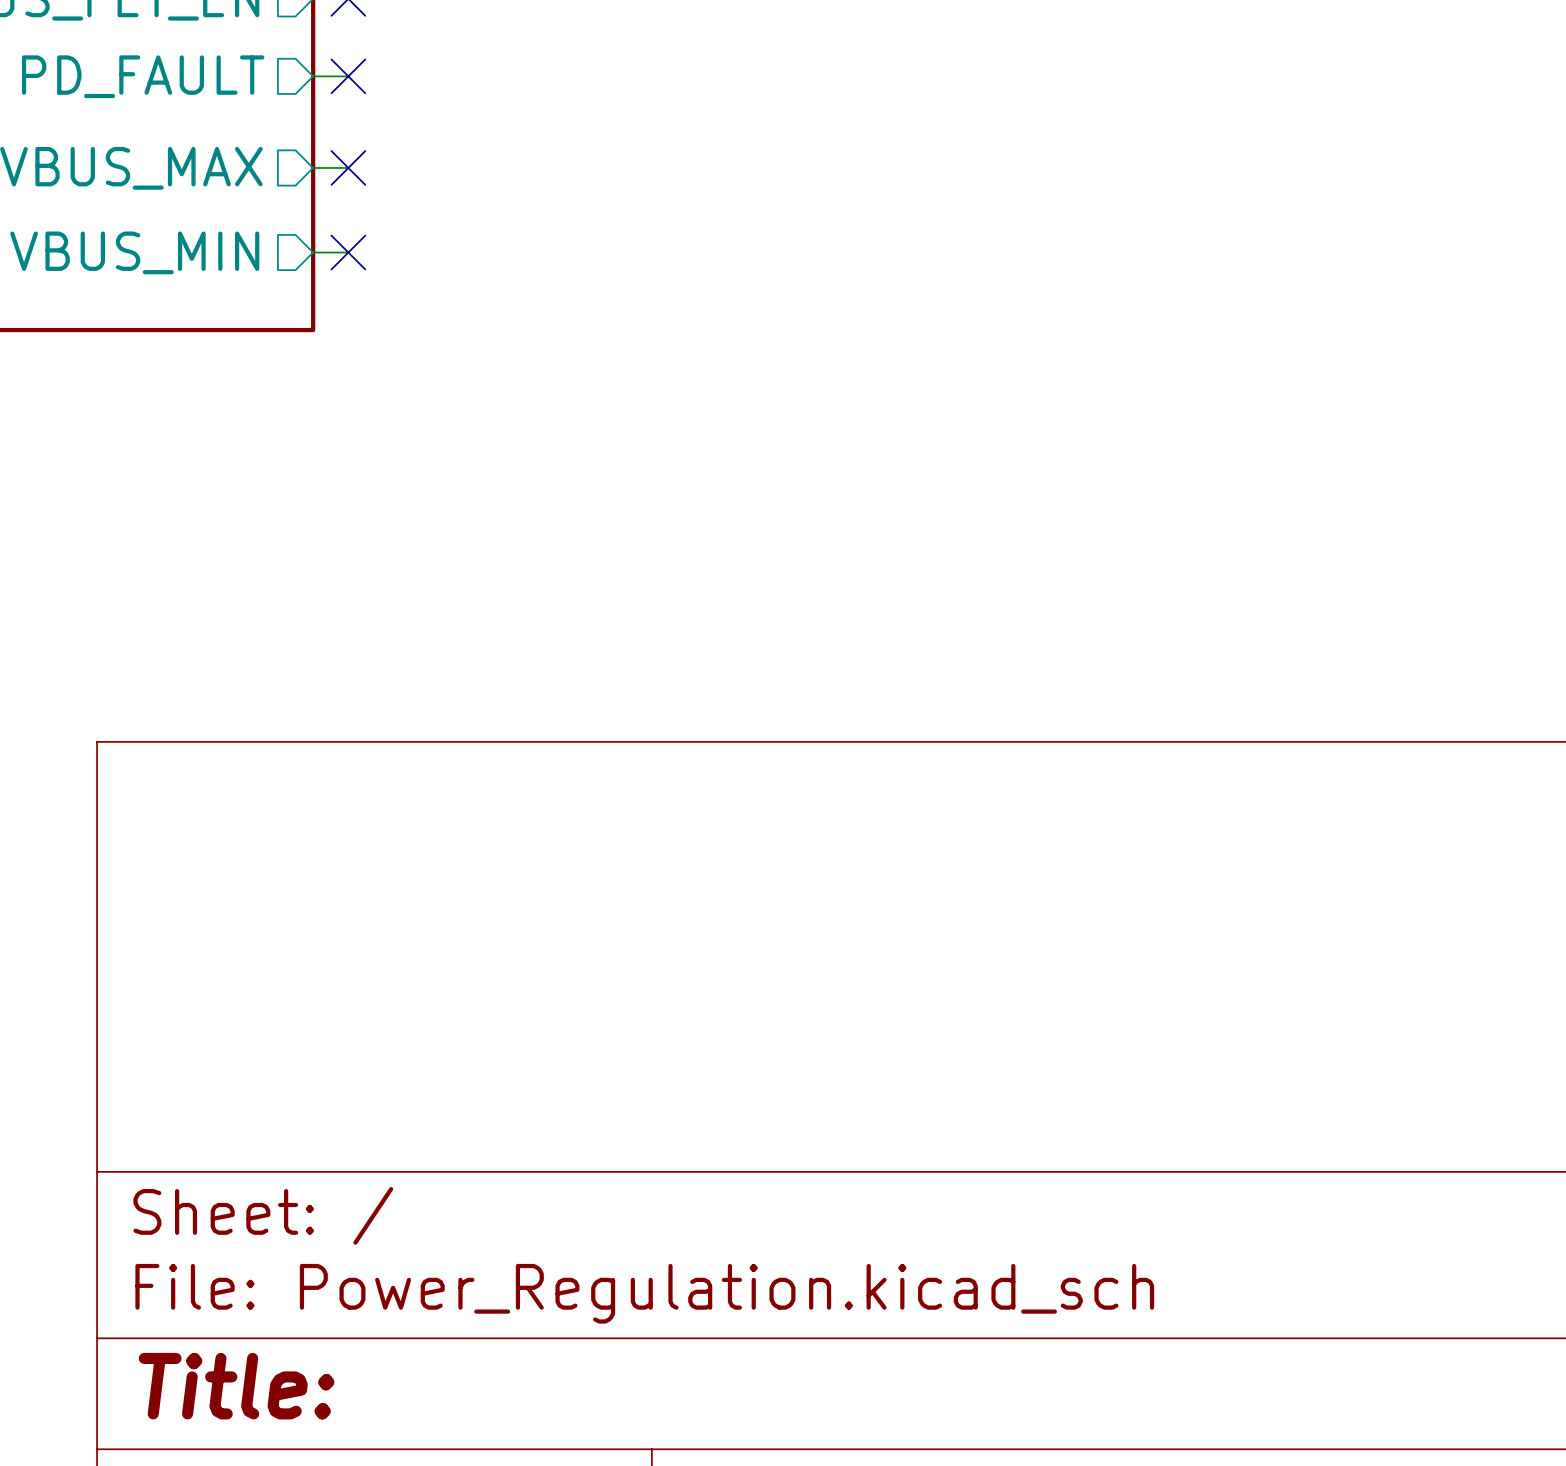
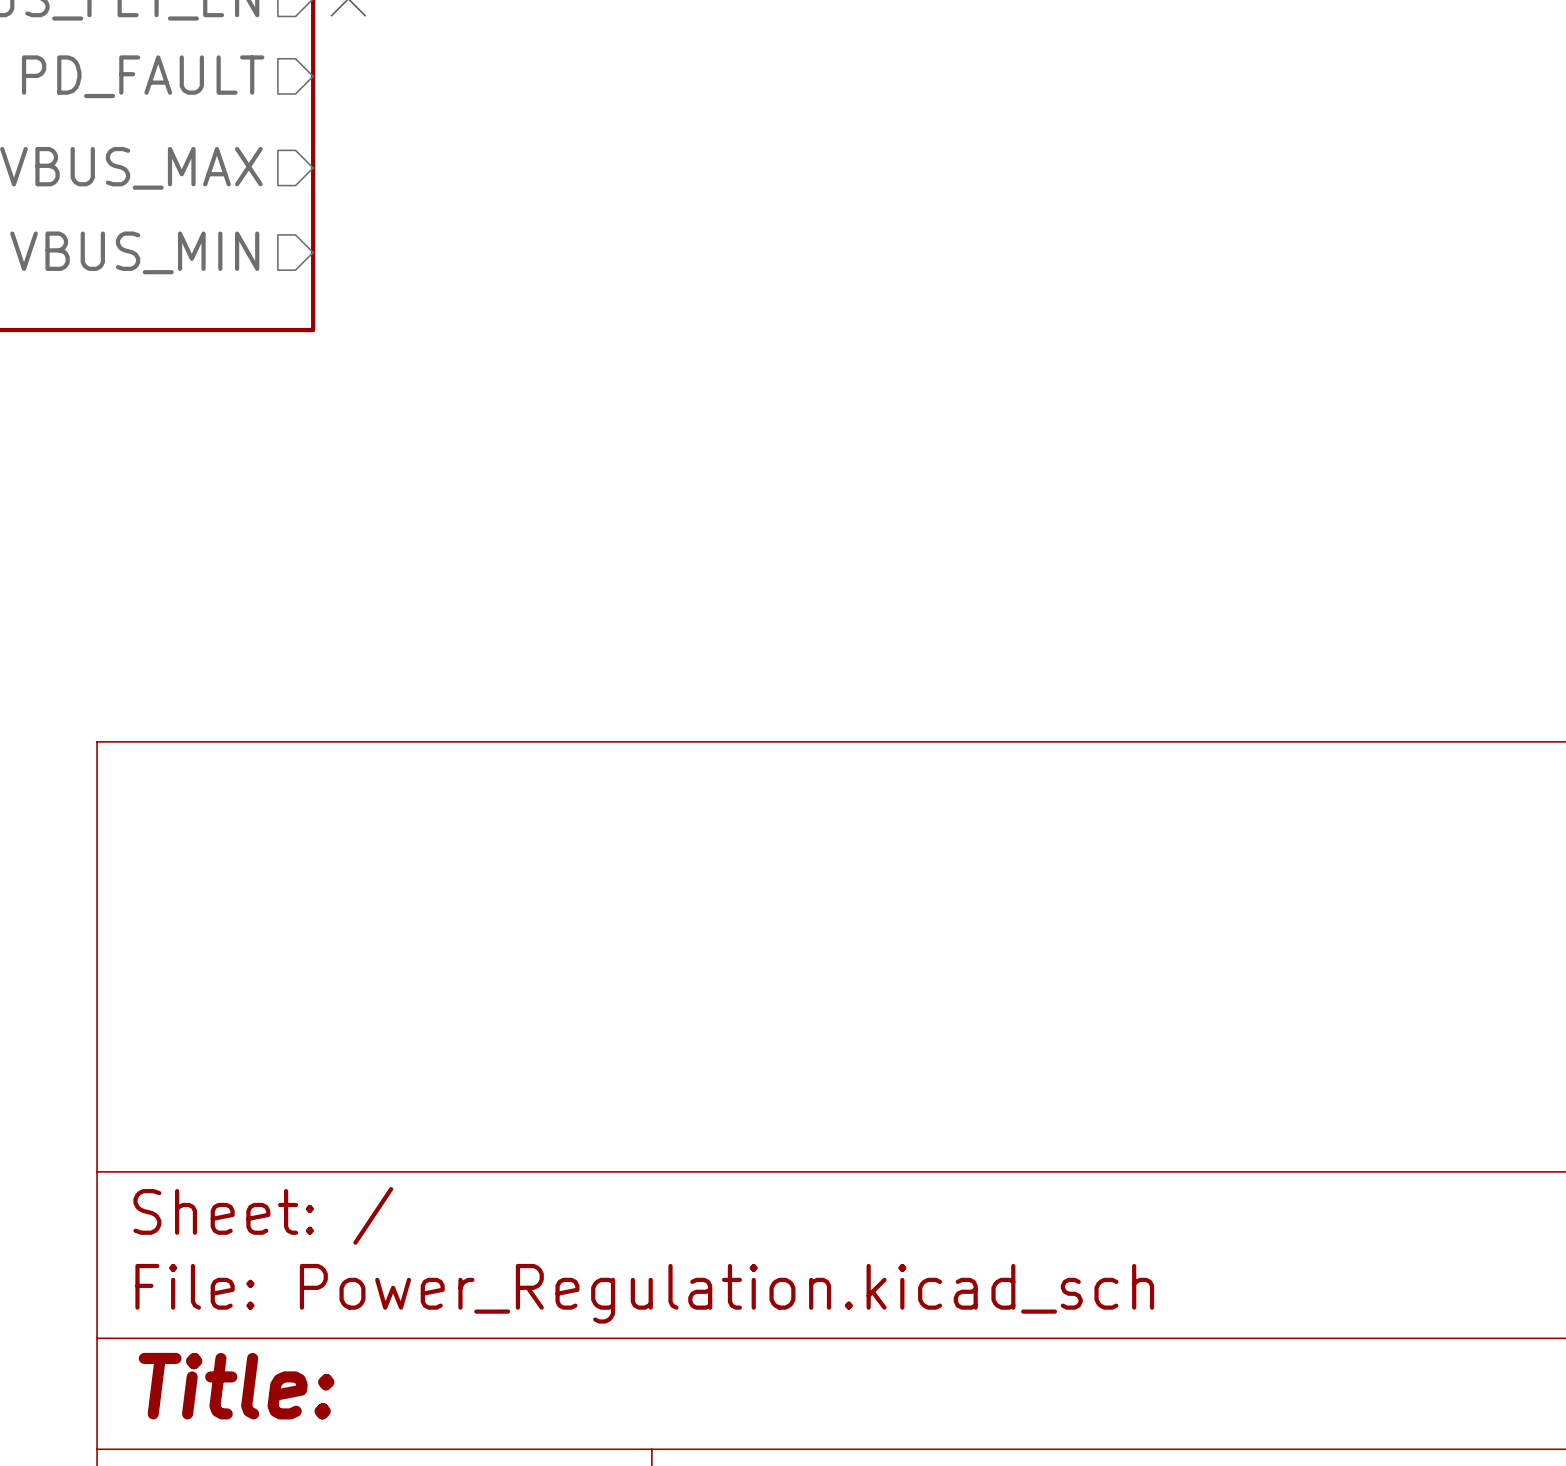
wire: (313, 76) (348, 76) -> none
no-connect mark: (348, 76) -> none
wire: (313, 167) (348, 167) -> none
no-connect mark: (348, 167) -> none
wire: (313, 252) (348, 252) -> none
no-connect mark: (348, 252) -> none

